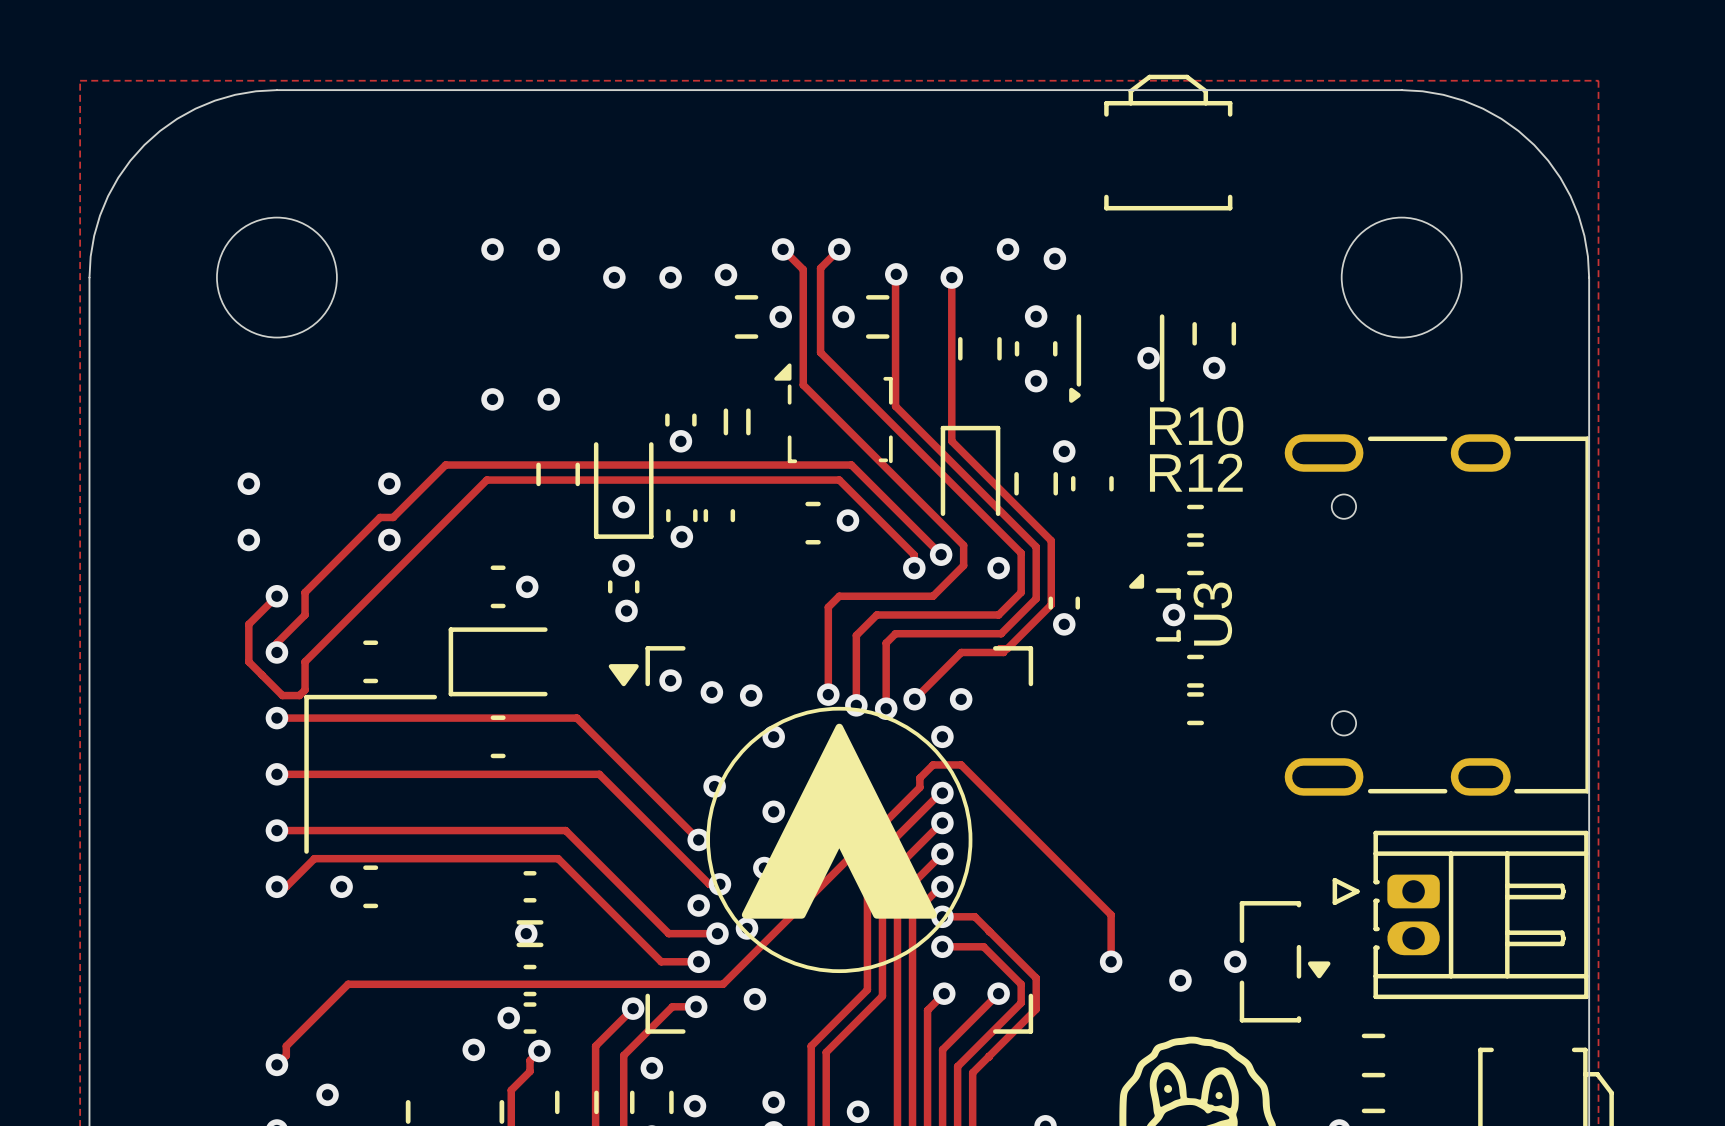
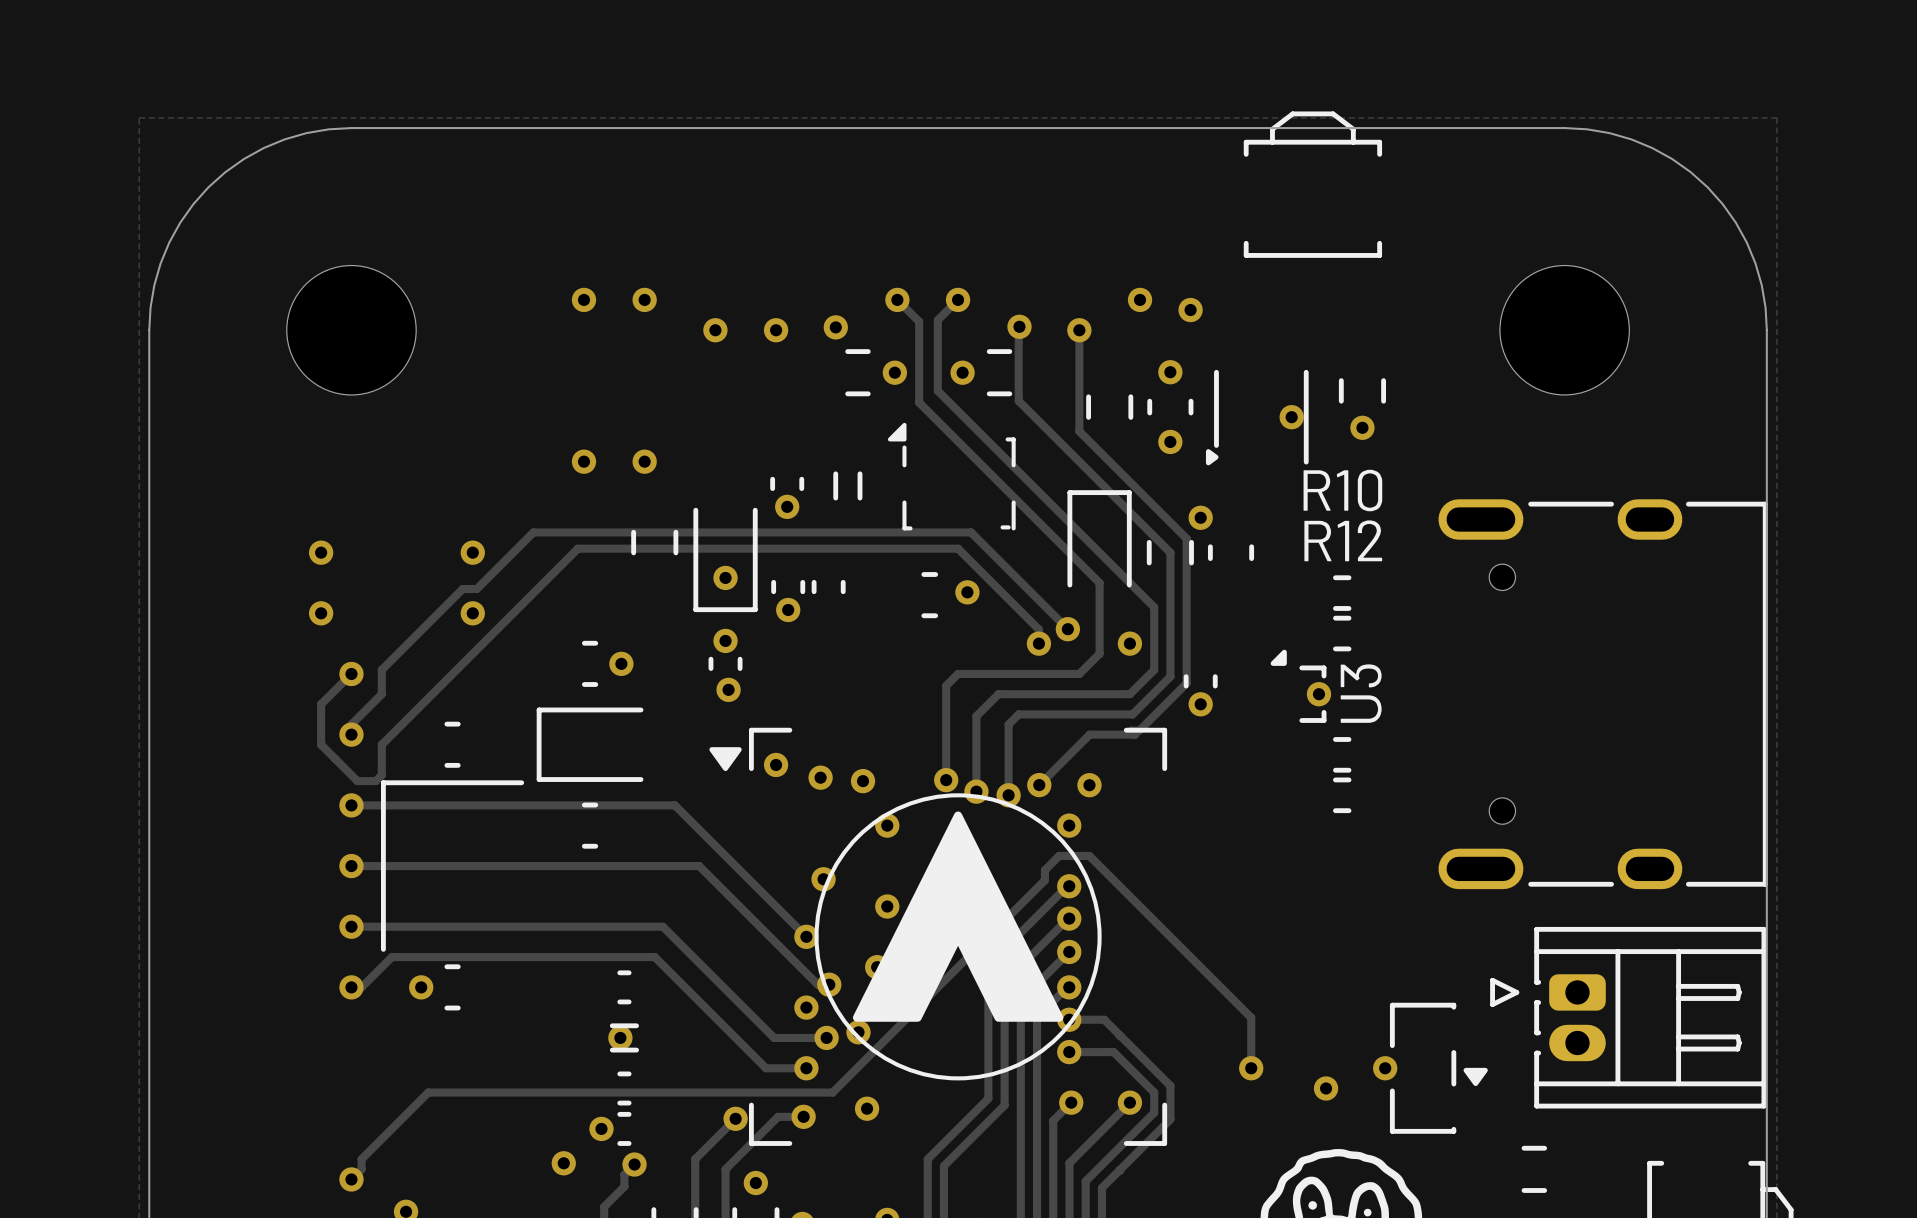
track: (820, 333) (820, 352) (1021, 553) -> (937, 390) (1154, 607) (1154, 627)
track: (895, 343) (895, 406) (1036, 546) -> (1018, 401) (1170, 552) (1170, 620)
track: (803, 344) (803, 384) (963, 545) (963, 565) (933, 596) -> (919, 402) (1099, 582) (1099, 653) (1079, 673) (1059, 673)
track: (951, 371) (951, 441) (1051, 540) -> (1079, 431) (1186, 538) (1186, 614)

